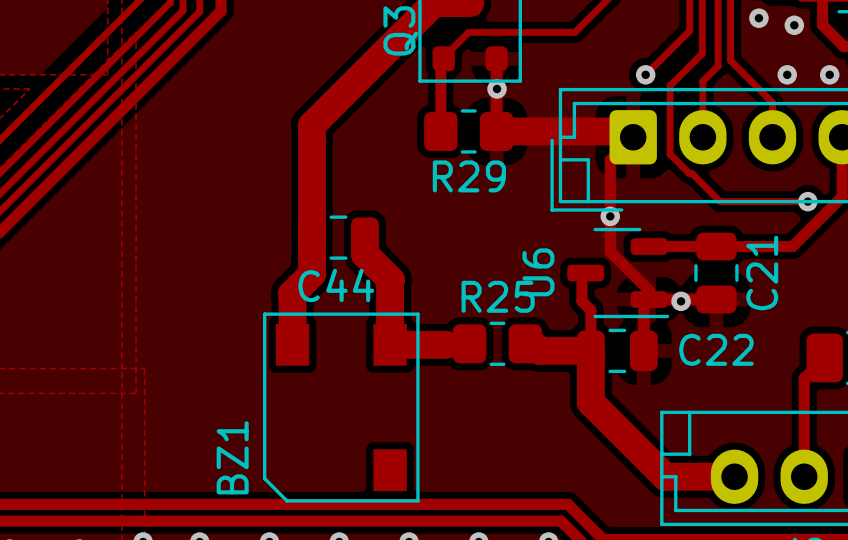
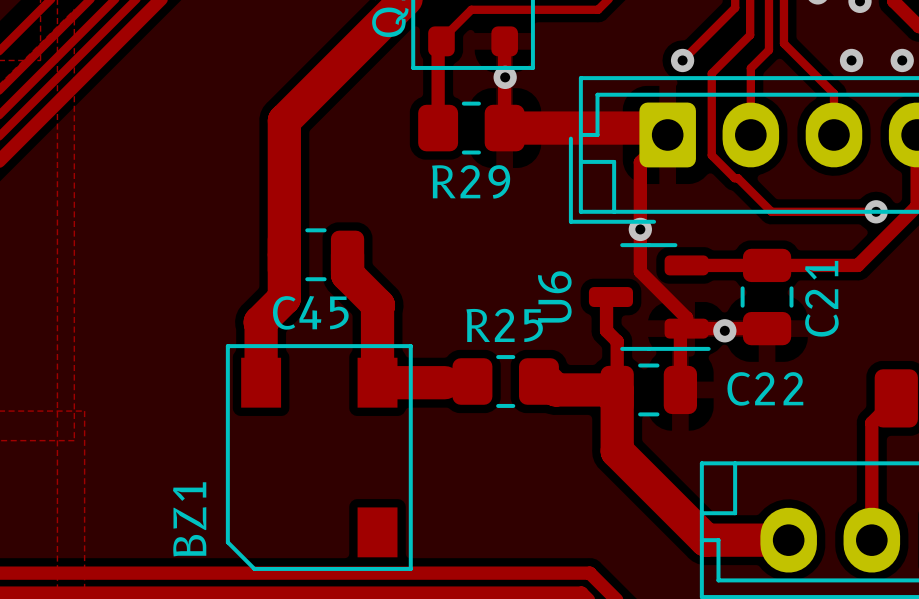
C44 name: C44 (336, 285) -> C45 (310, 312)

